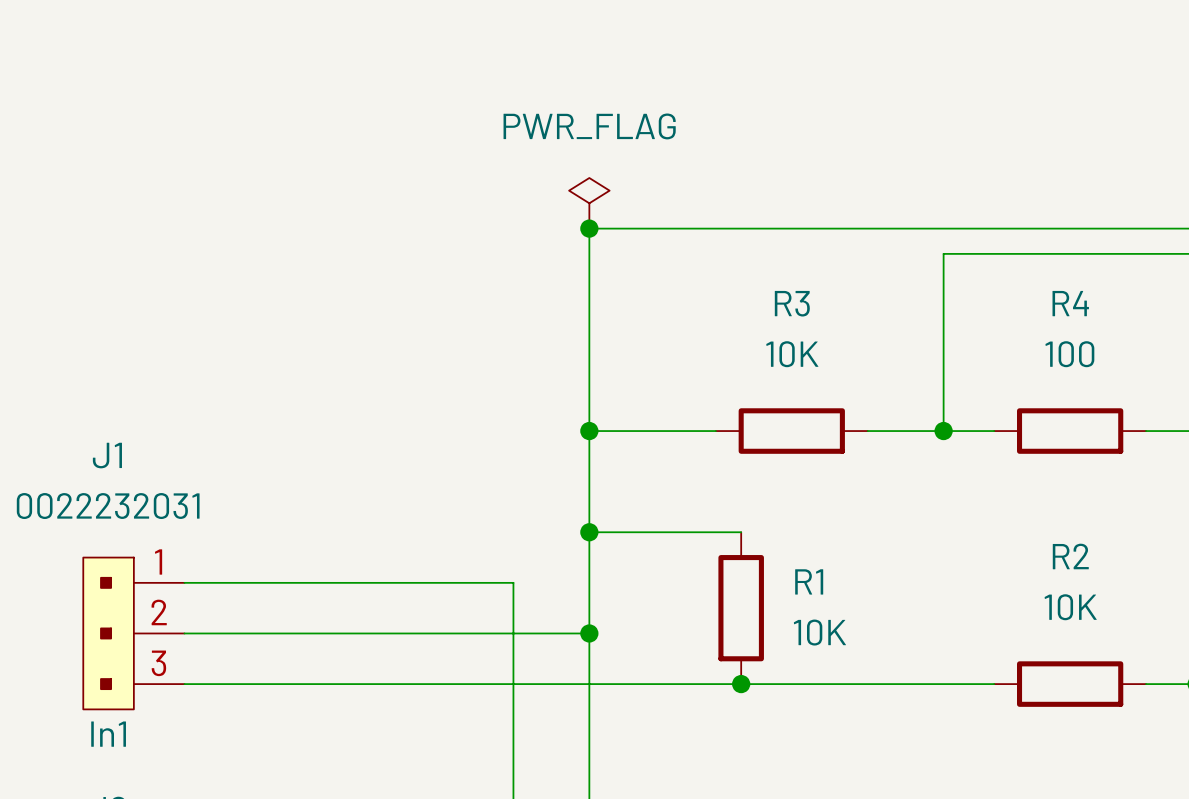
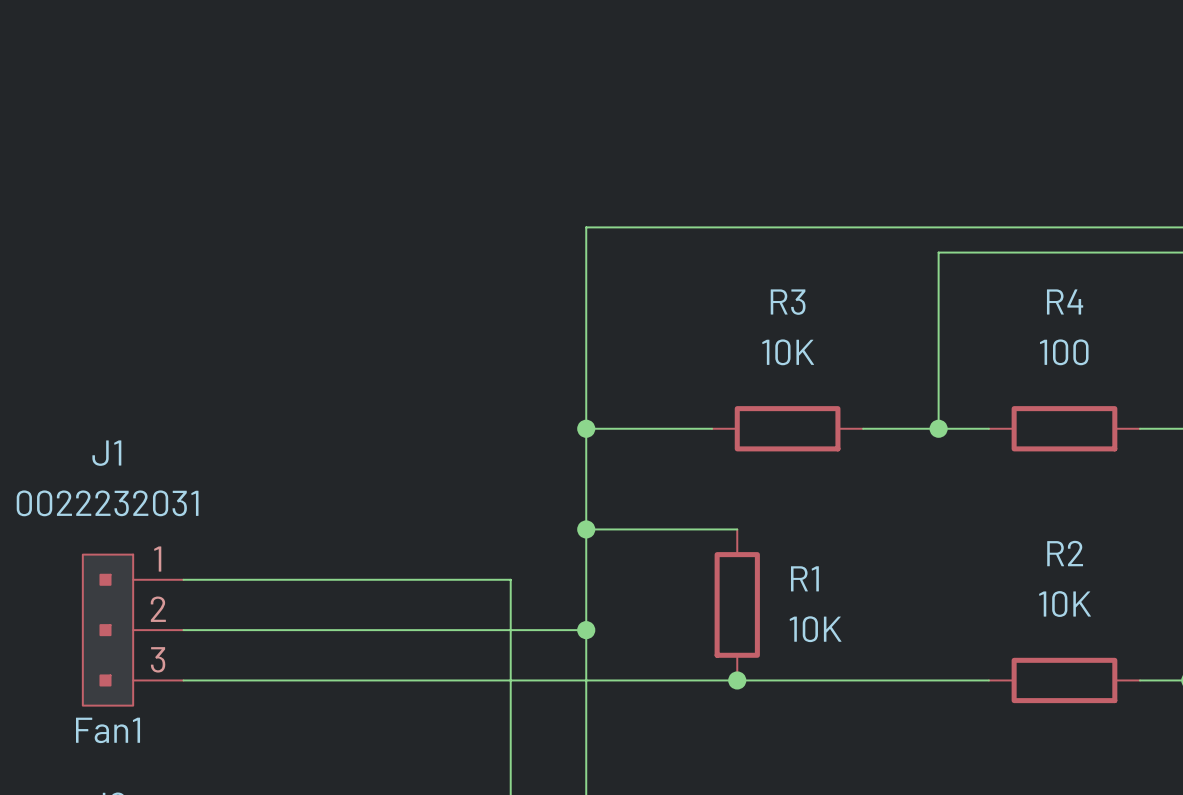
power symbol: PWR_FLAG (589, 203) -> none
junction: (589, 228) -> none
J1 text: In1 (108, 734) -> Fan1 (108, 730)

